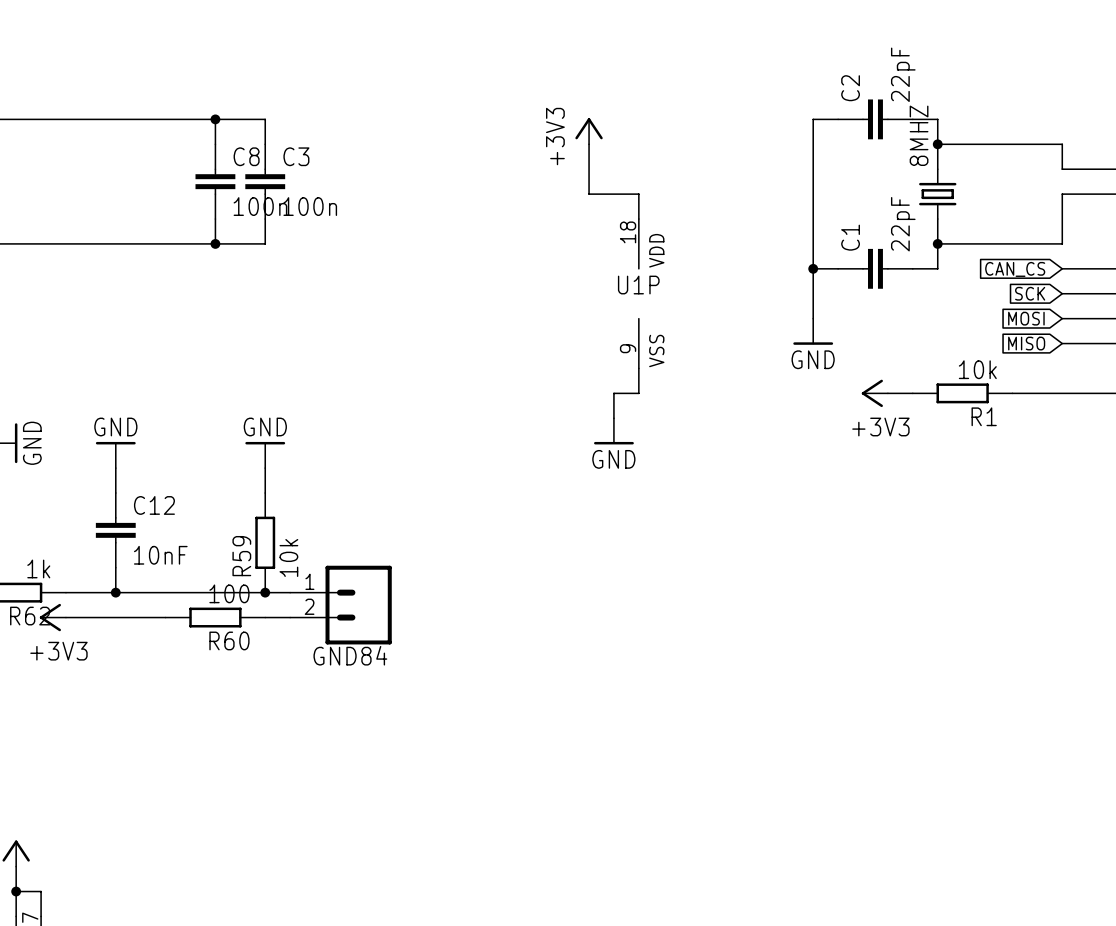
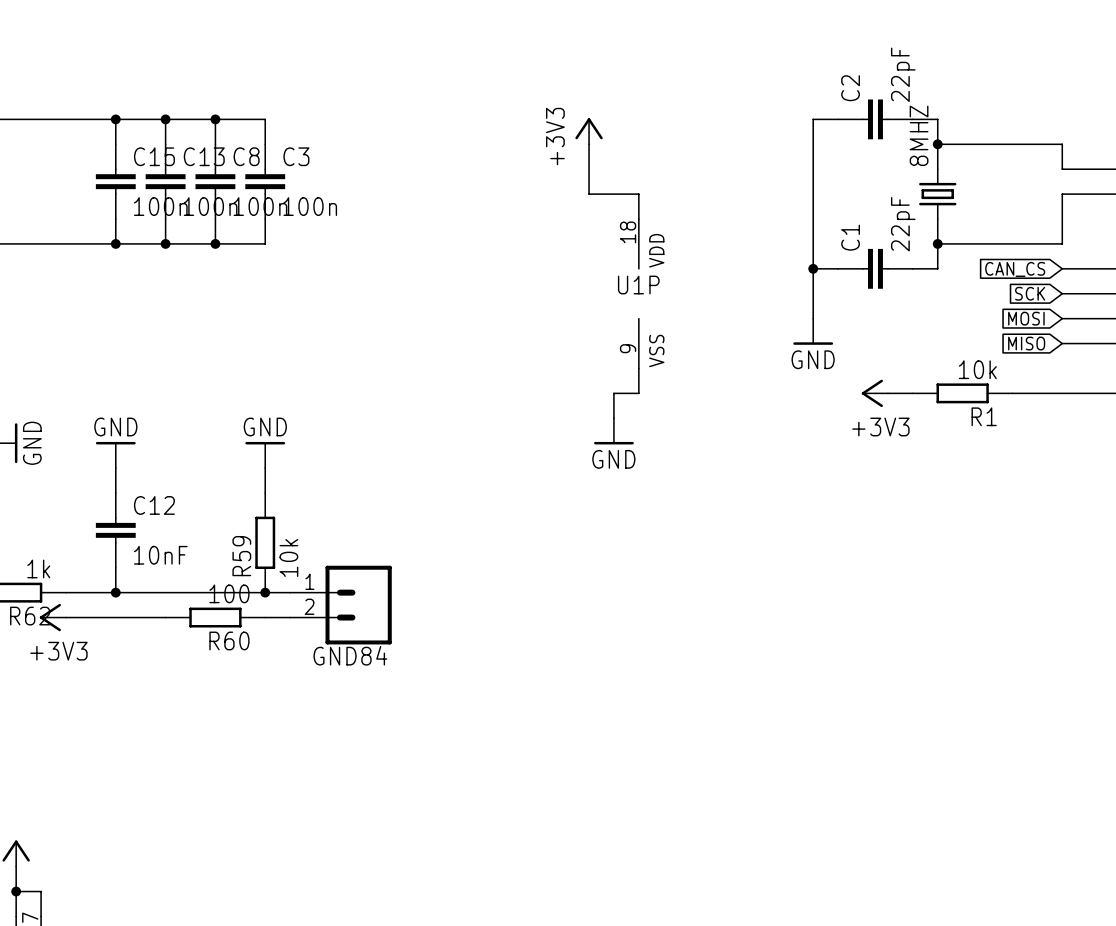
wire: none -> (115, 119) (115, 144)
junction: none -> (115, 119)
wire: none -> (165, 119) (165, 144)
junction: none -> (165, 119)
C15: none -> 100n (115, 181)
C13: none -> 100n (165, 181)
wire: none -> (115, 219) (115, 243)
wire: none -> (165, 219) (165, 243)
junction: none -> (115, 243)
junction: none -> (165, 243)

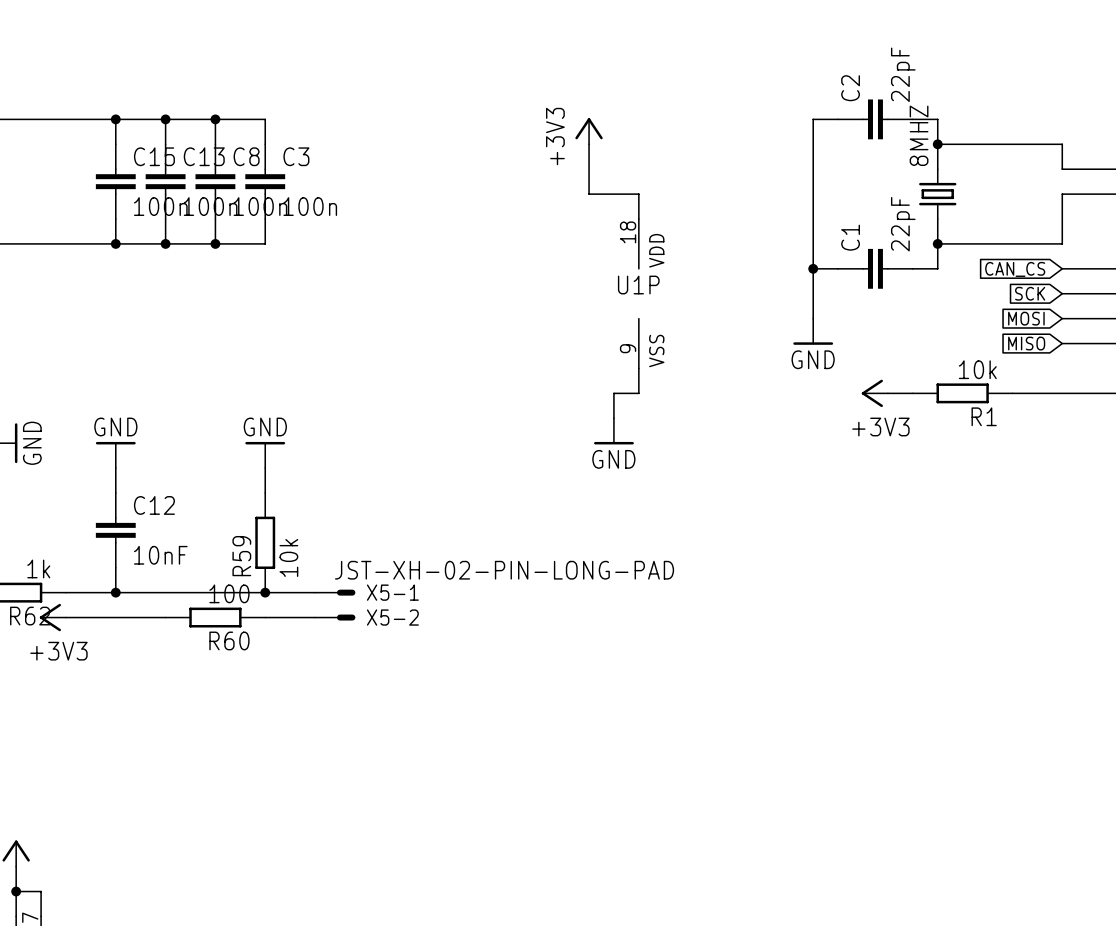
X5-1: none -> JST-XH-02-PIN-LONG-PAD (335, 592)
GND84: (340, 605) -> none
X5-2: none -> (335, 617)

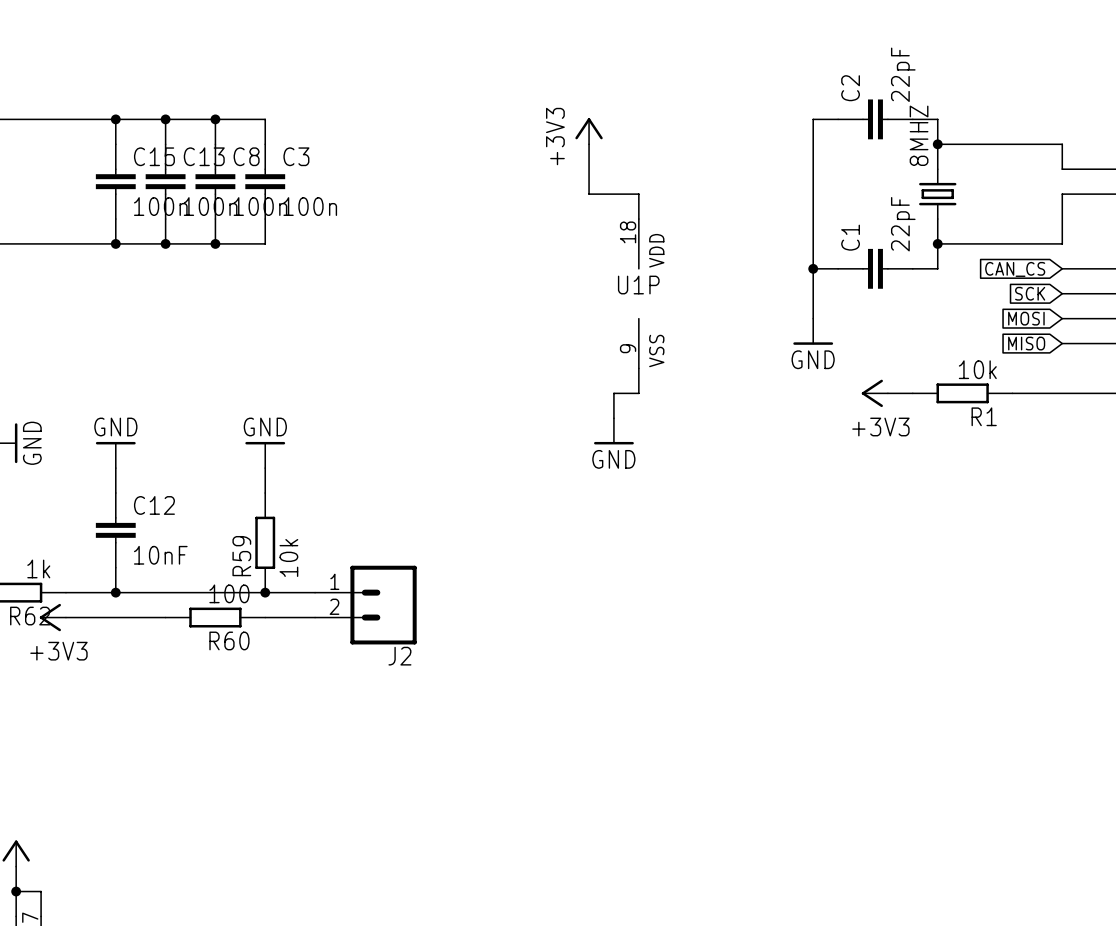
X5-1: JST-XH-02-PIN-LONG-PAD (335, 592) -> none
J2: none -> (365, 605)
X5-2: (335, 617) -> none

